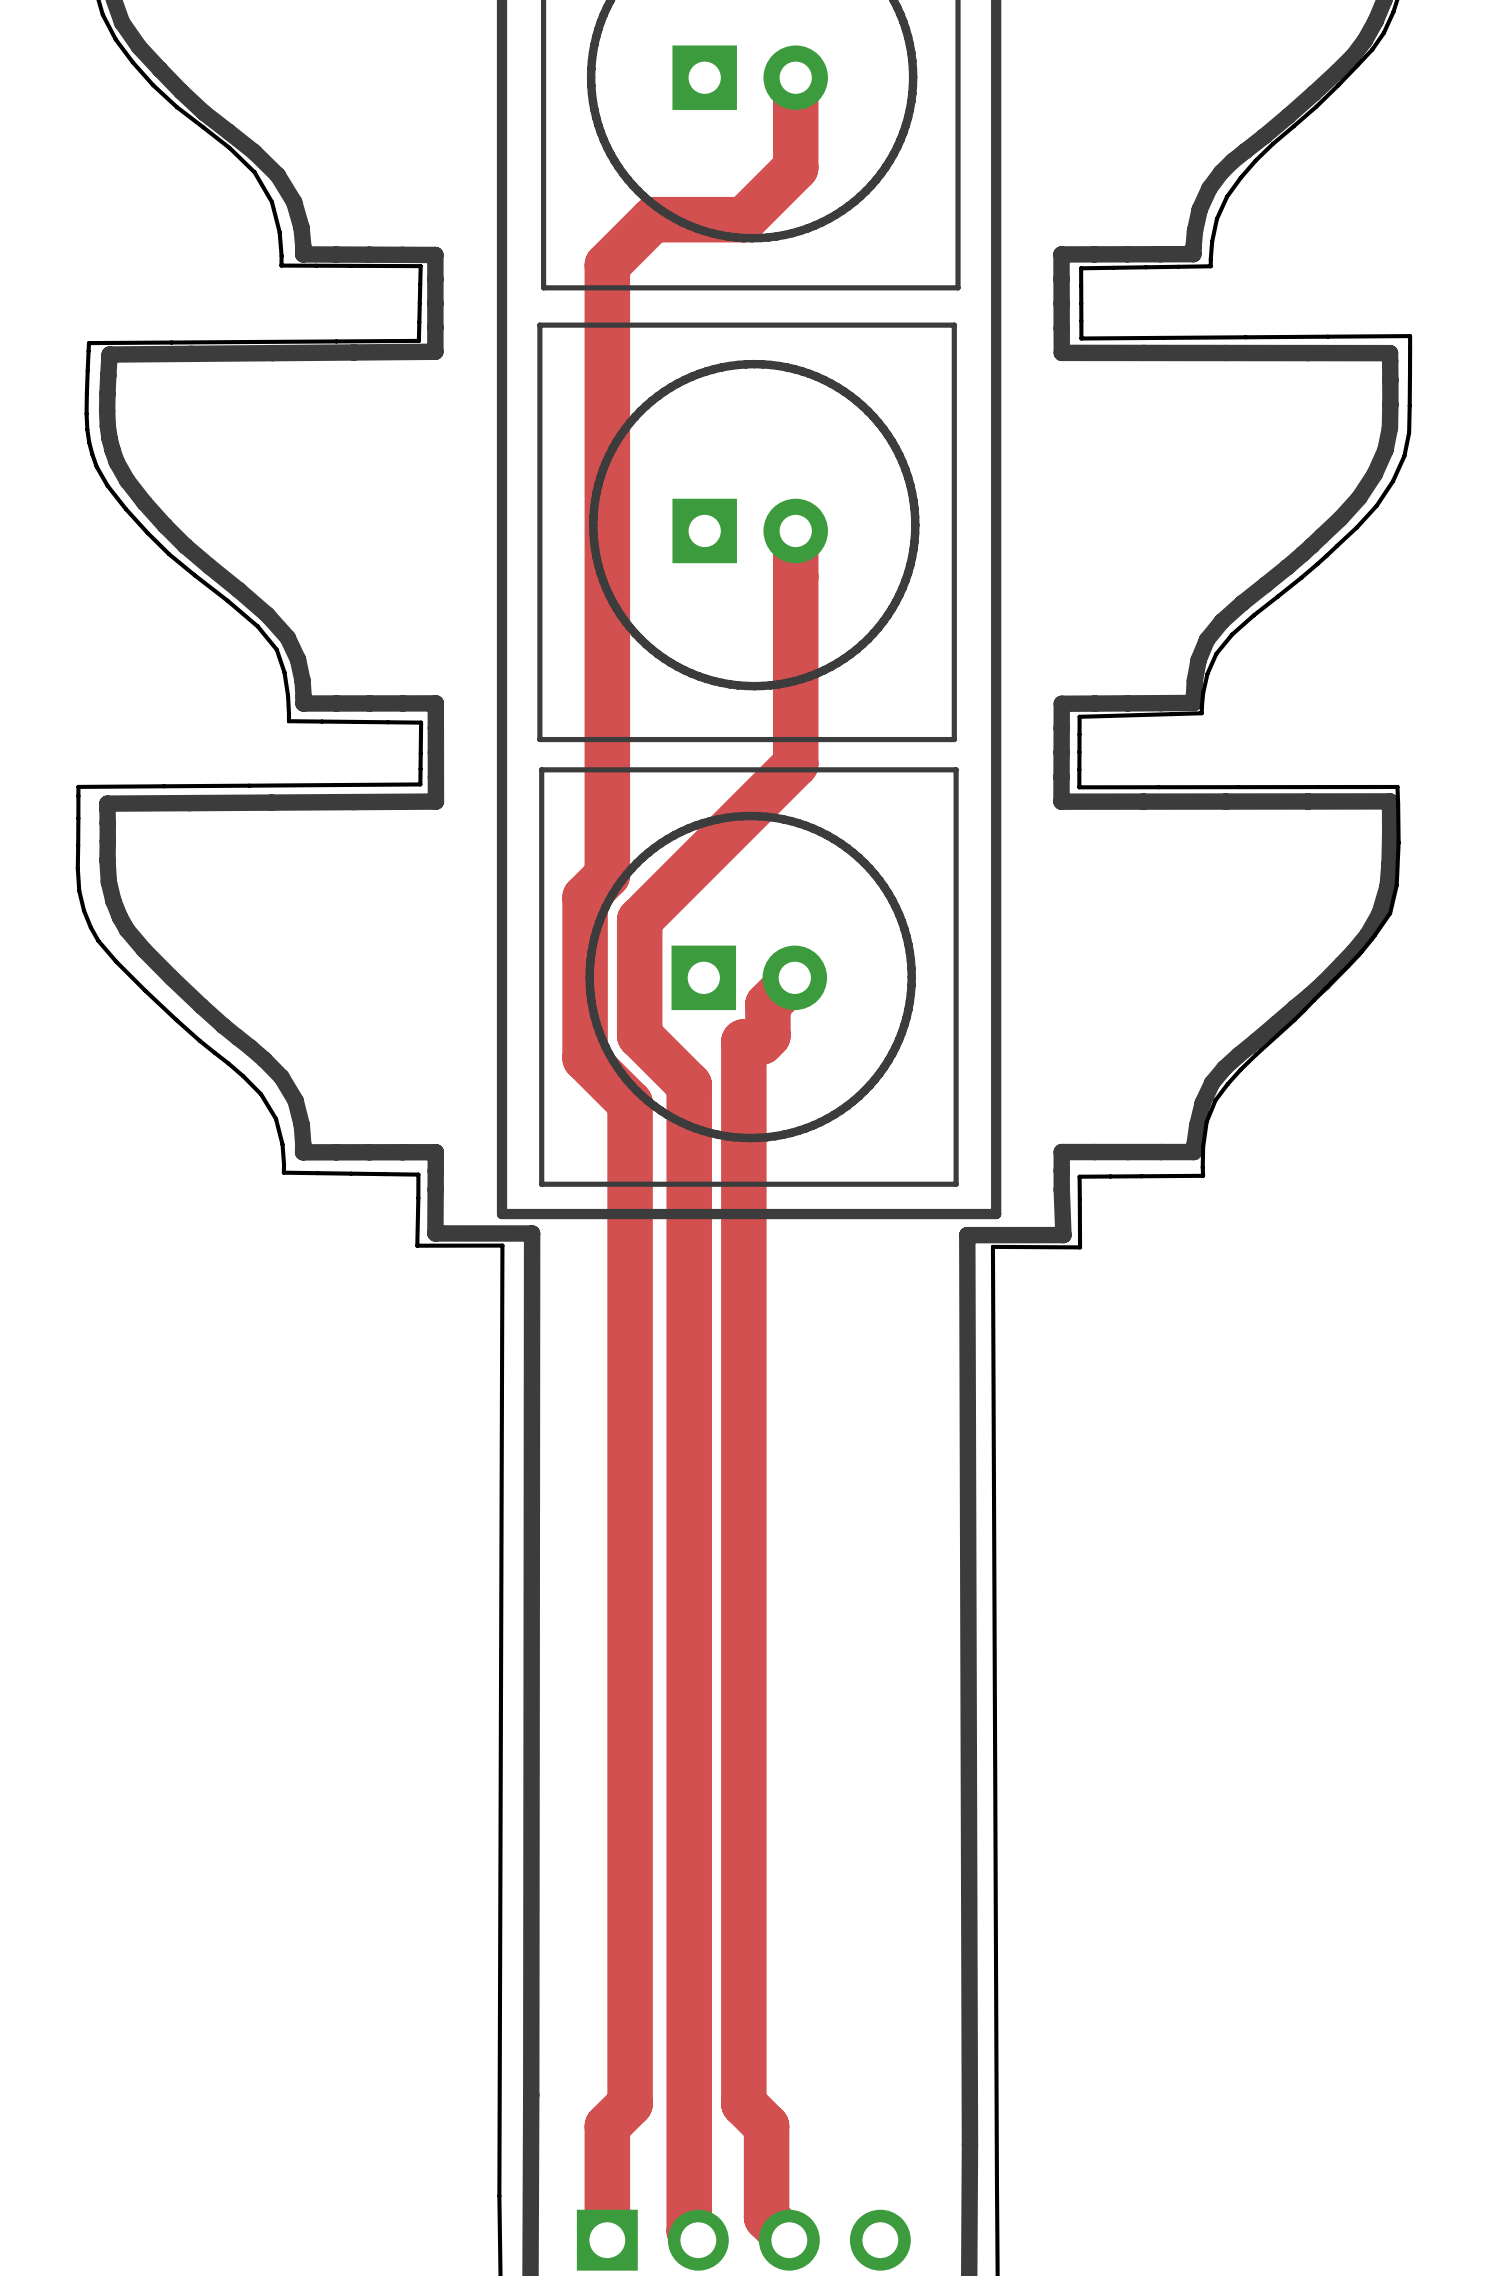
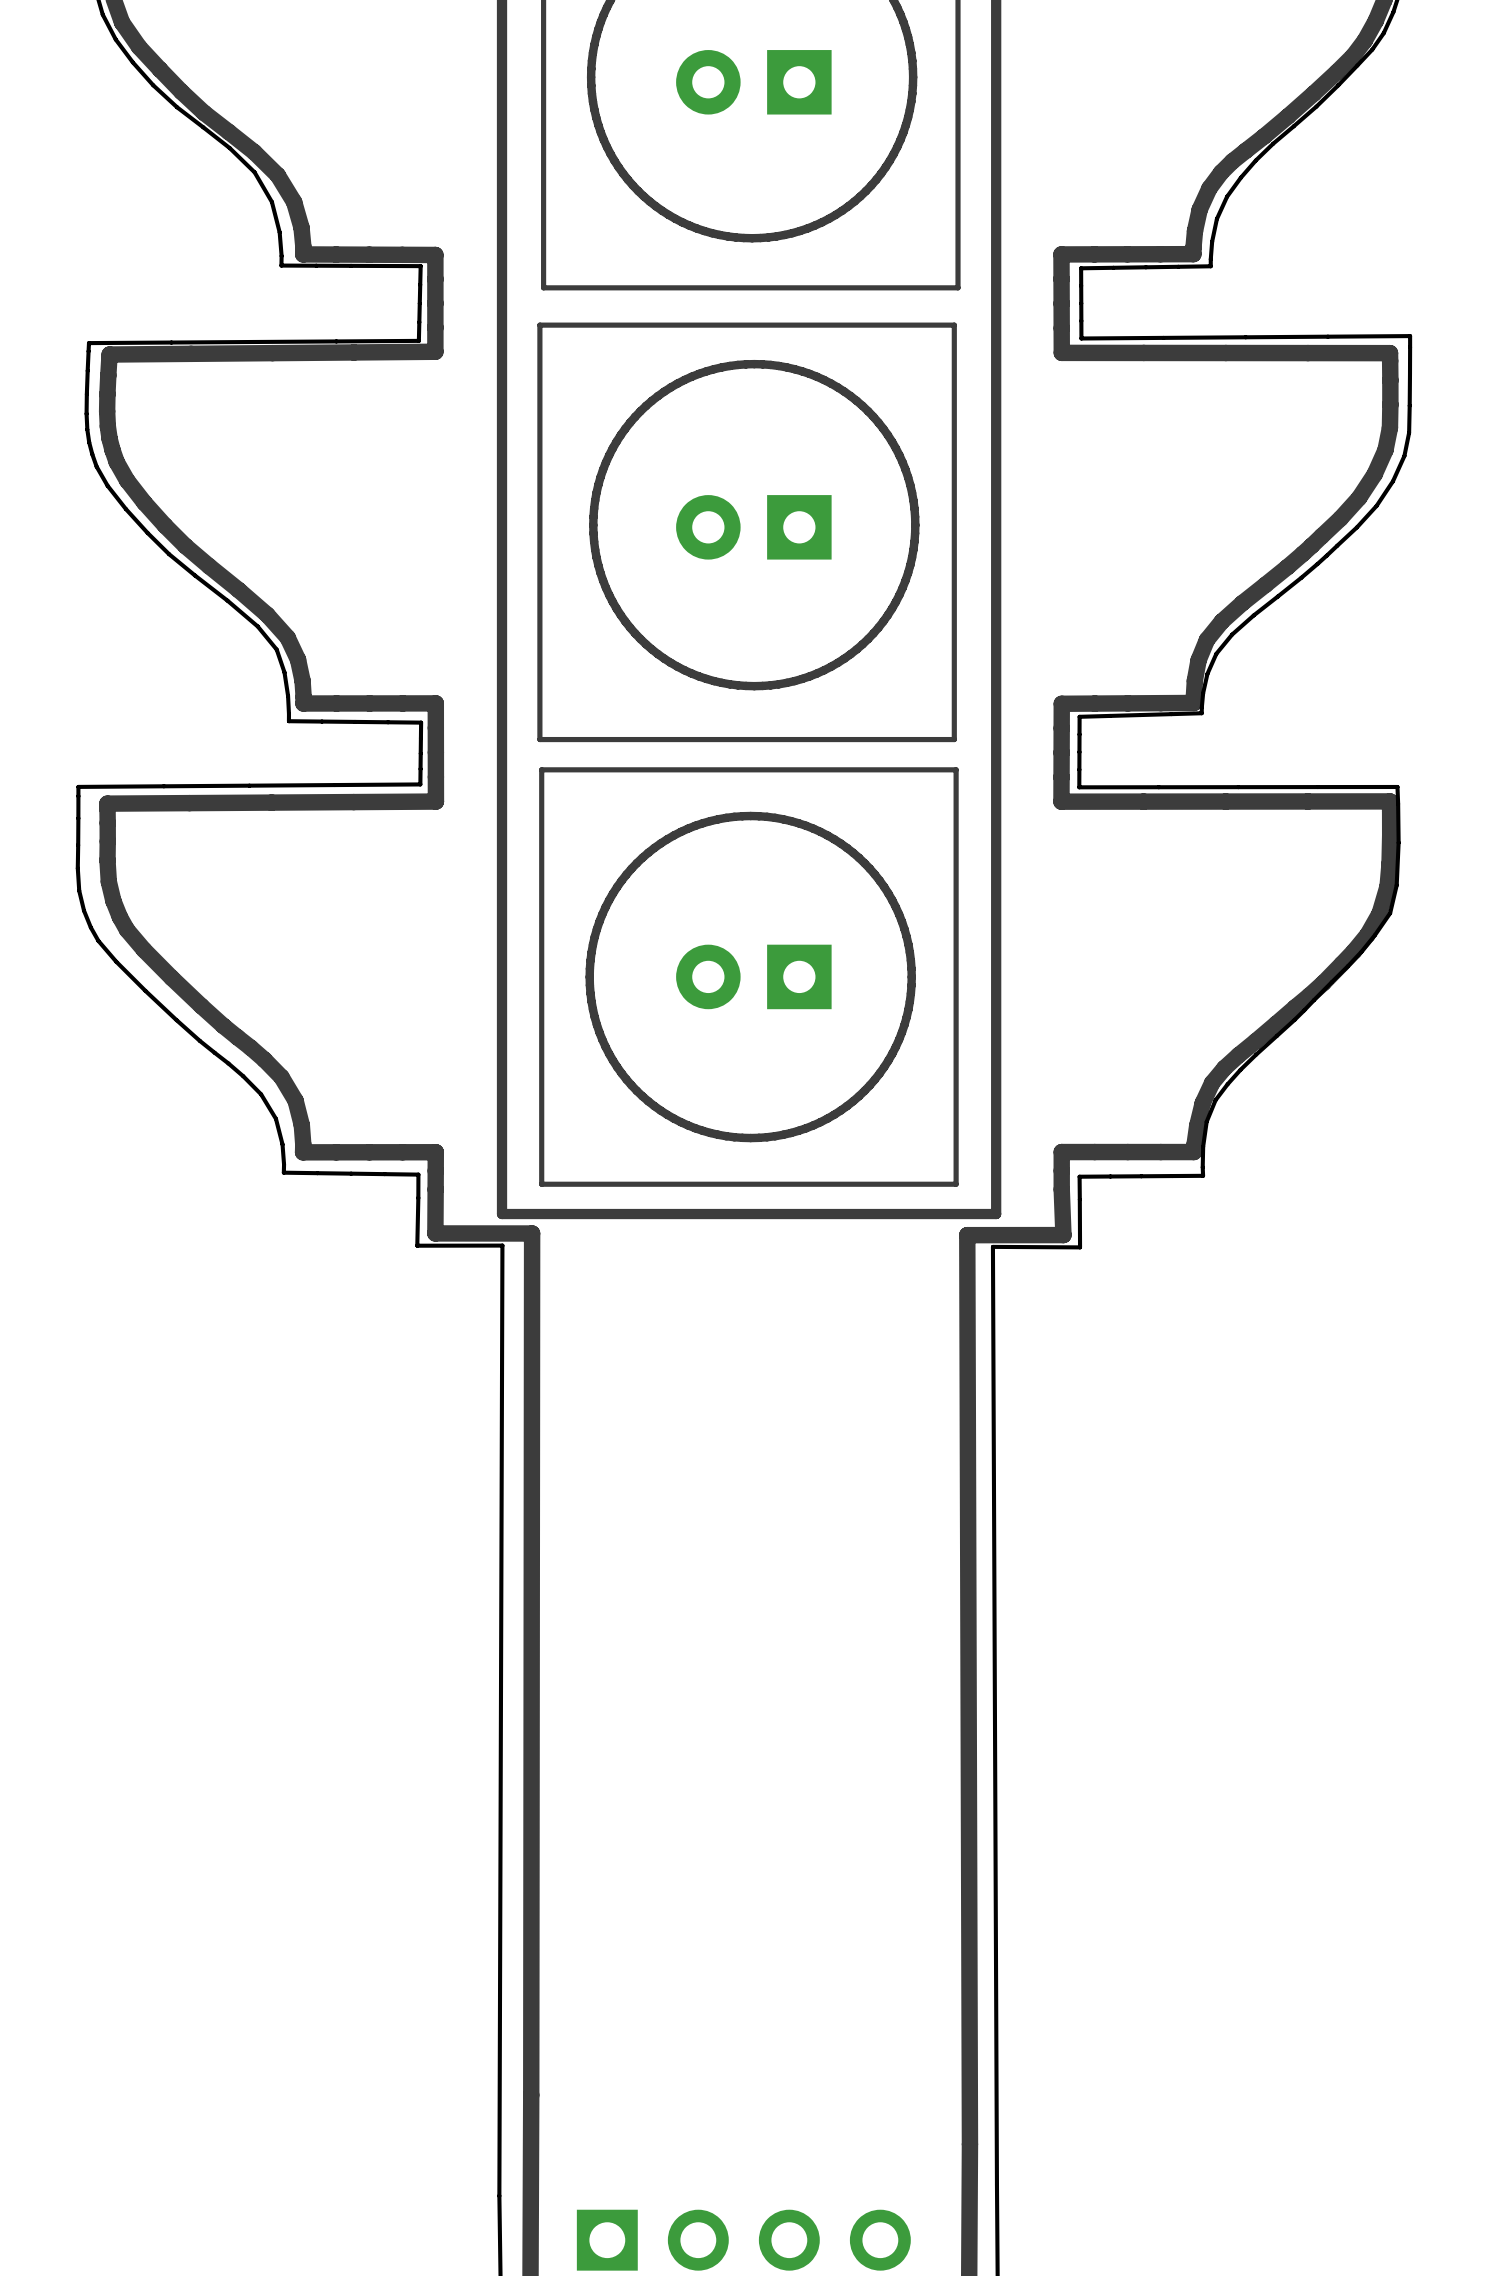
part rotation: 0° (750, 77) -> 180° (753, 82)
track: (795, 77) (795, 167) (743, 219) (652, 219) (607, 265) (607, 875) (585, 897) (585, 1058) (630, 1103) (630, 2103) (607, 2126) (607, 2240) -> none
part rotation: 0° (750, 530) -> 180° (753, 527)
track: (795, 530) (795, 764) (639, 920) (639, 1035) (689, 1085) (689, 2231) (698, 2240) -> none
part rotation: 0° (749, 977) -> 180° (753, 976)
track: (794, 977) (767, 1004) (767, 1035) (761, 1041) (743, 1041) (743, 2103) (766, 2126) (766, 2217) (789, 2240) -> none

